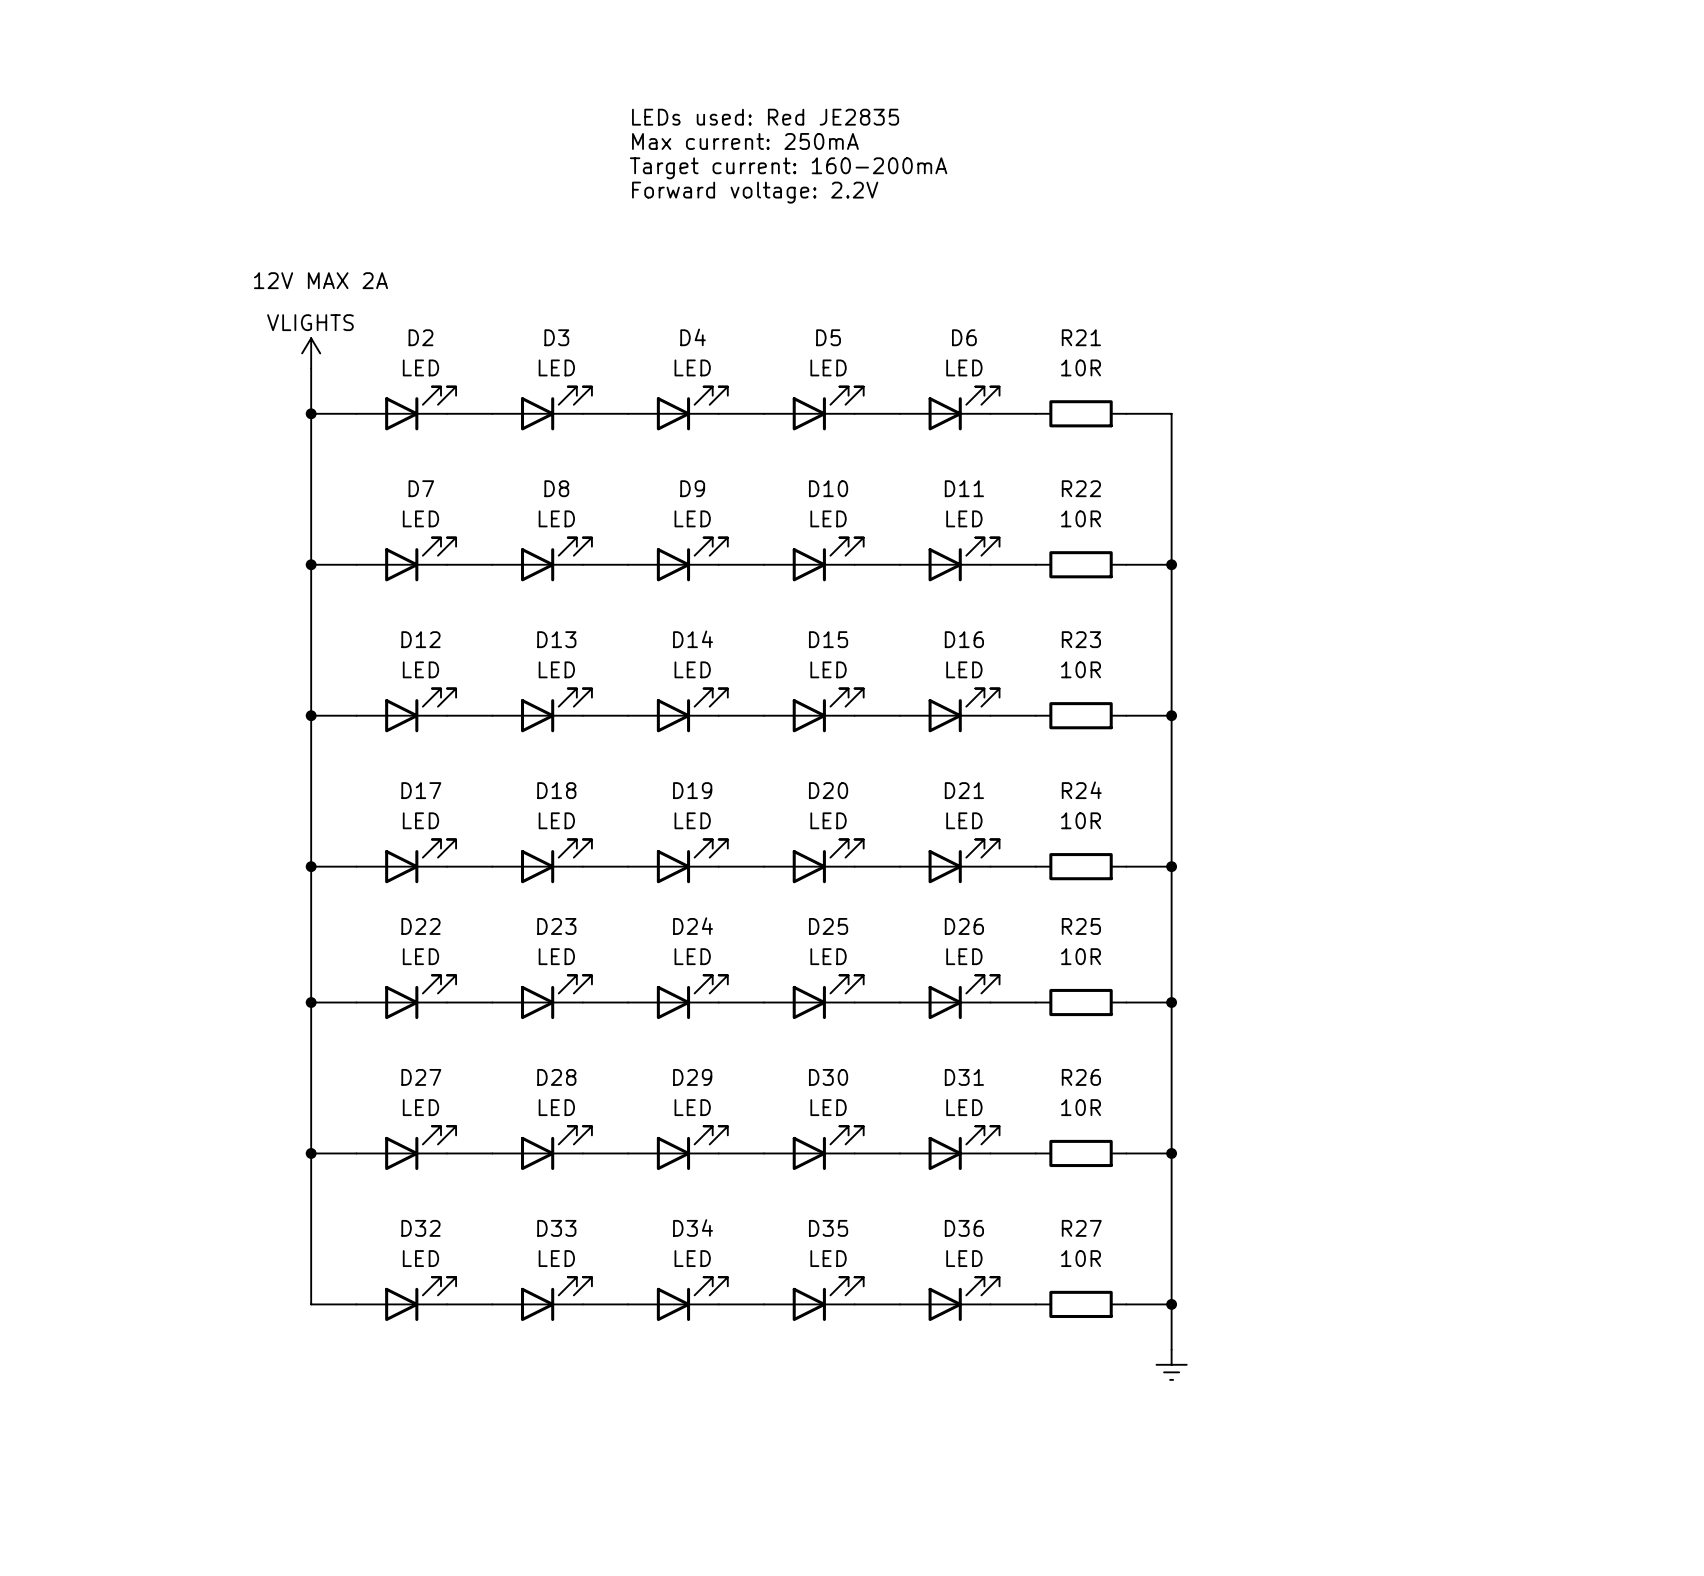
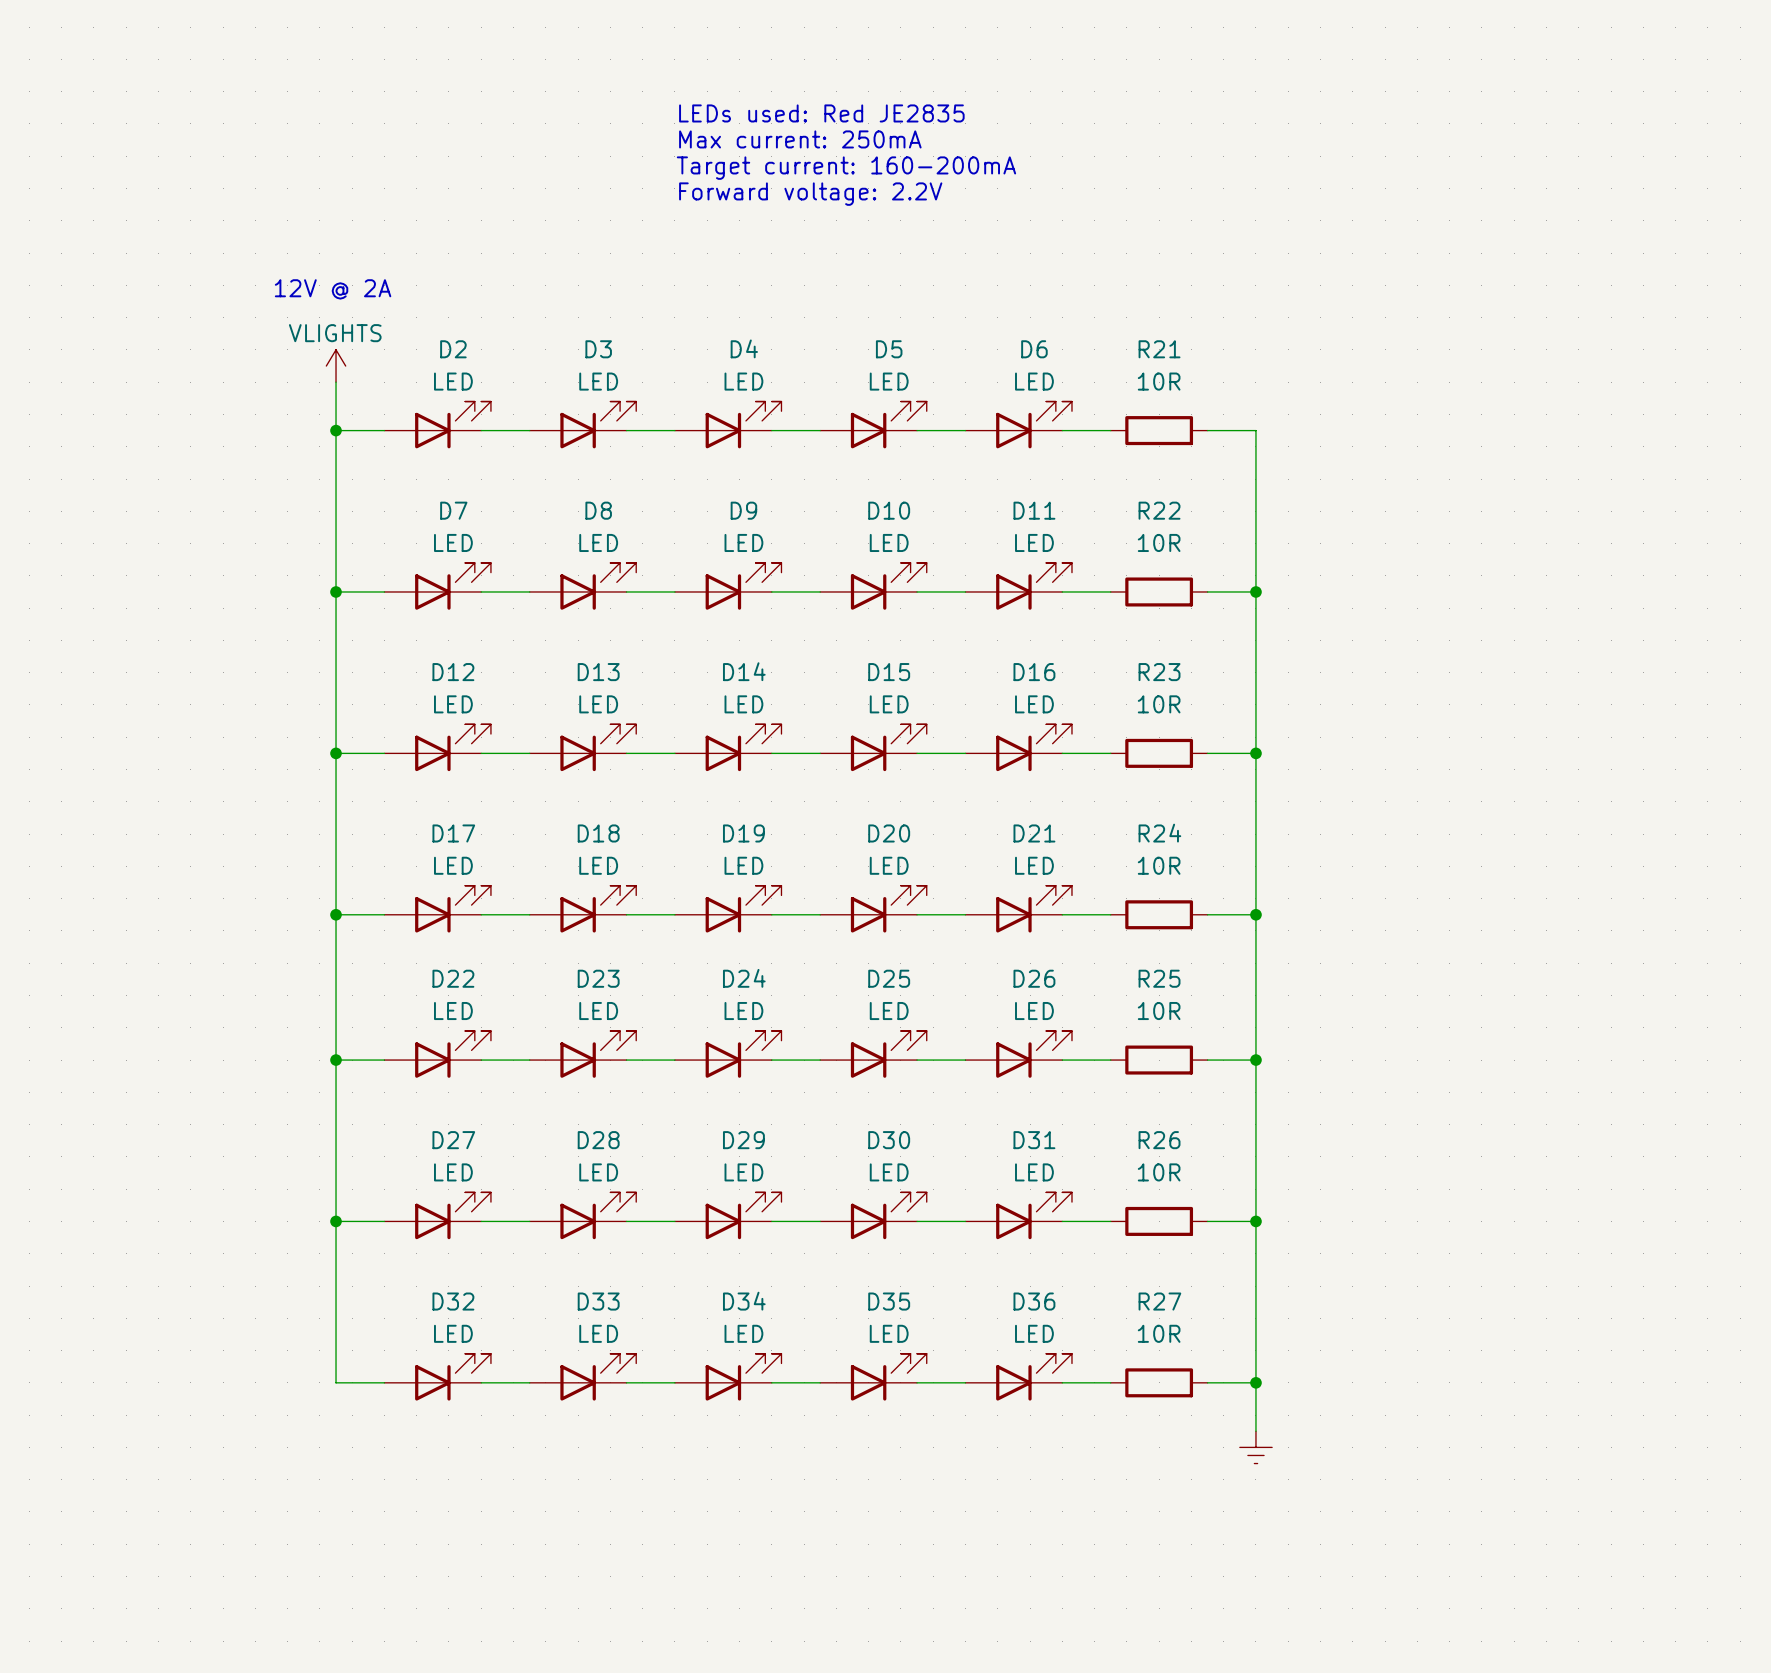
text: 12V MAX 2A (320, 280) -> 12V @ 2A (333, 289)

